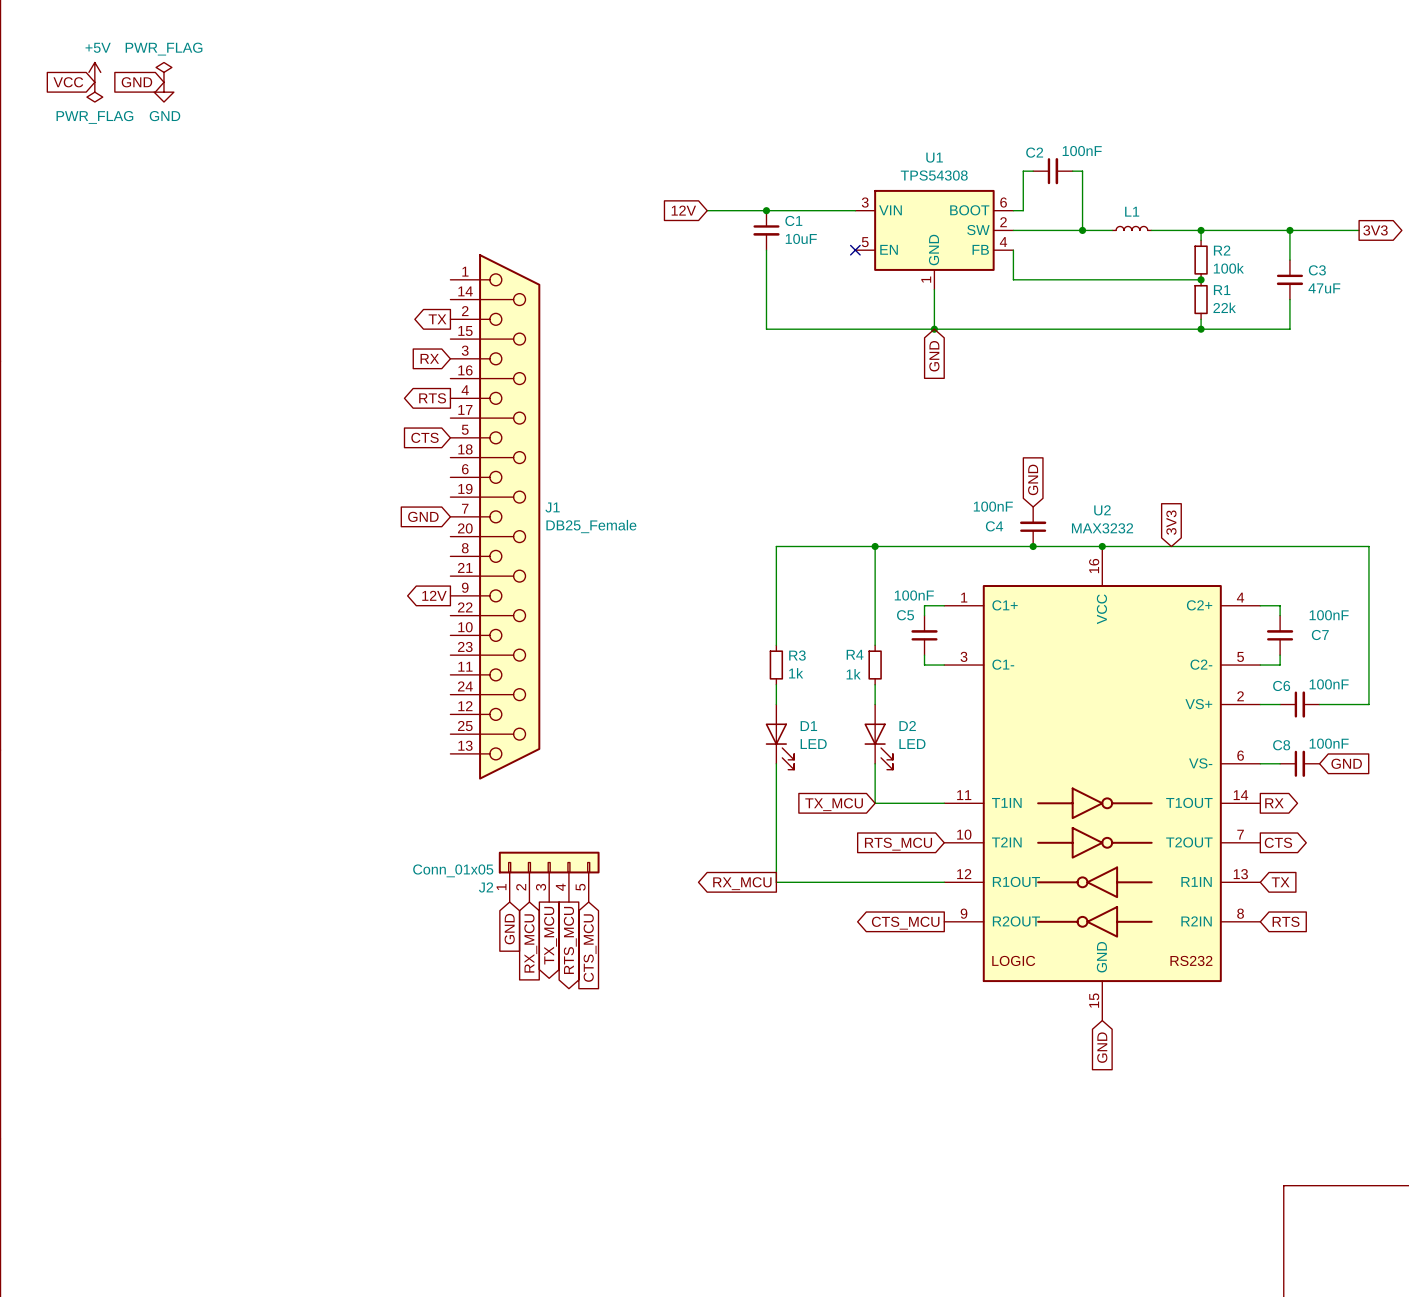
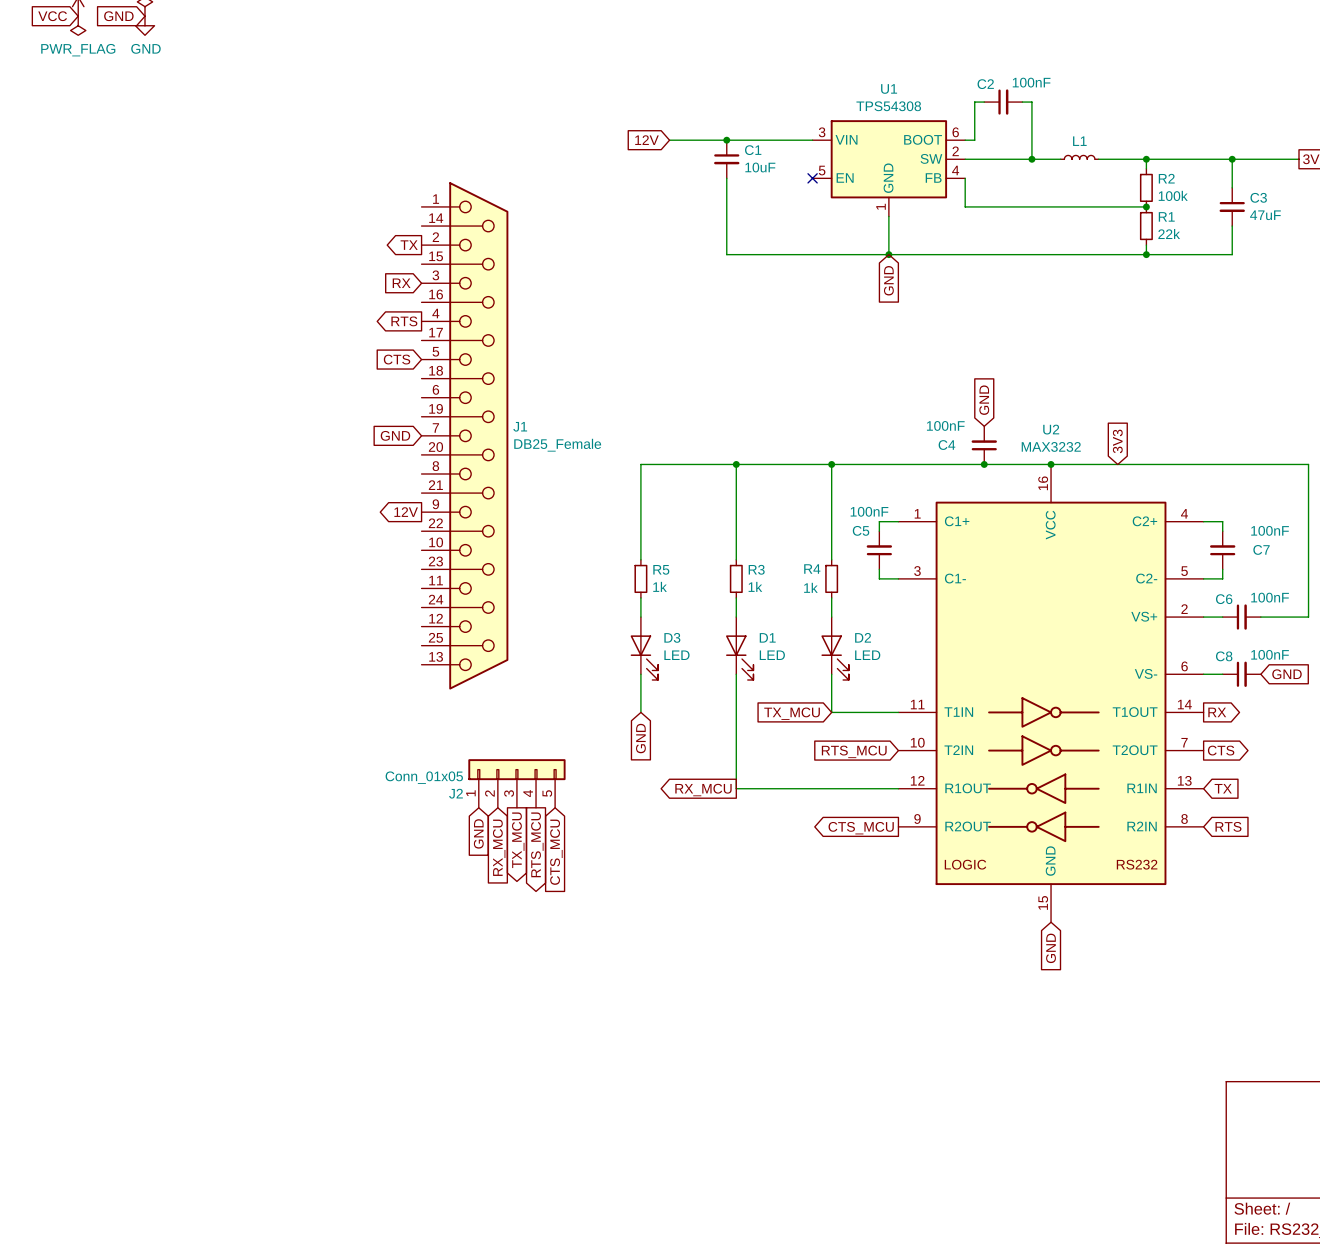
wire: none -> (736, 464) (640, 464) (640, 559)
junction: none -> (736, 464)
R5: none -> 1k (640, 578)
wire: none -> (640, 597) (640, 617)
D3: none -> LED (644, 648)
wire: none -> (640, 674) (640, 712)
global label: none -> GND (640, 738)

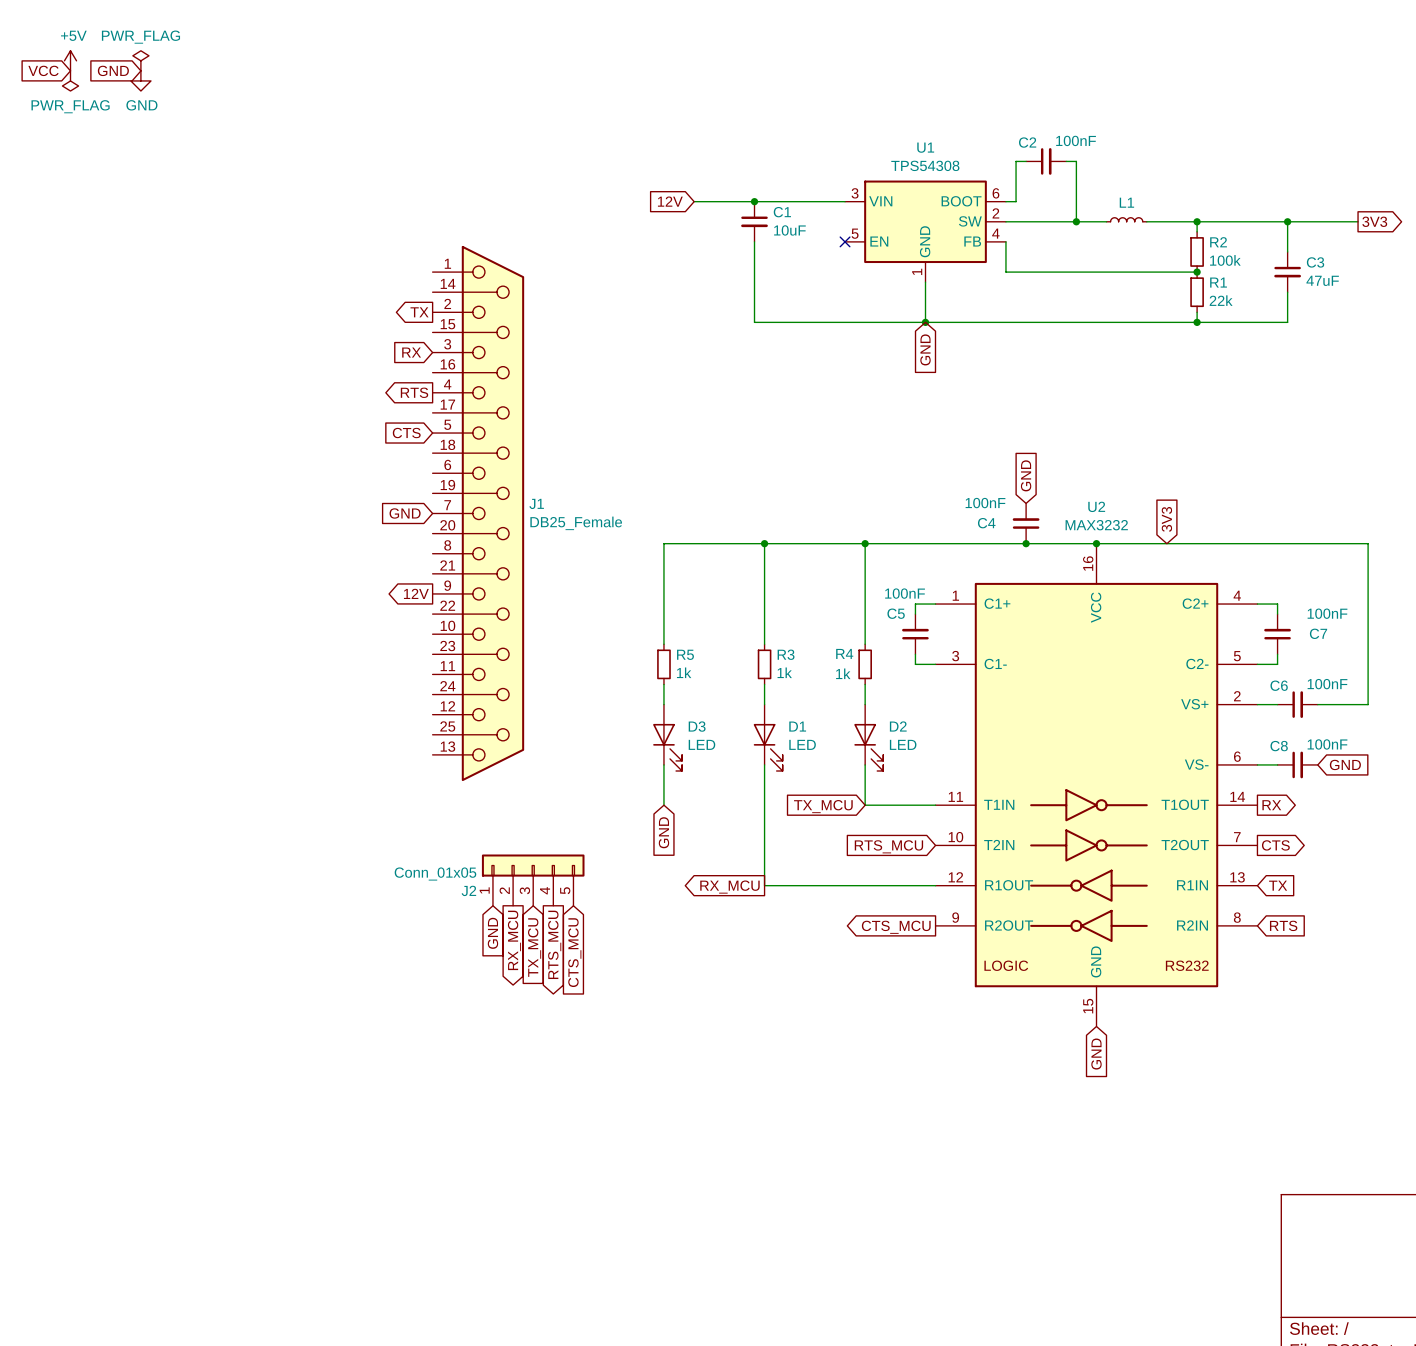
global label shape: output (518, 840) -> input (534, 947)
global label shape: input (499, 847) -> output (514, 940)

